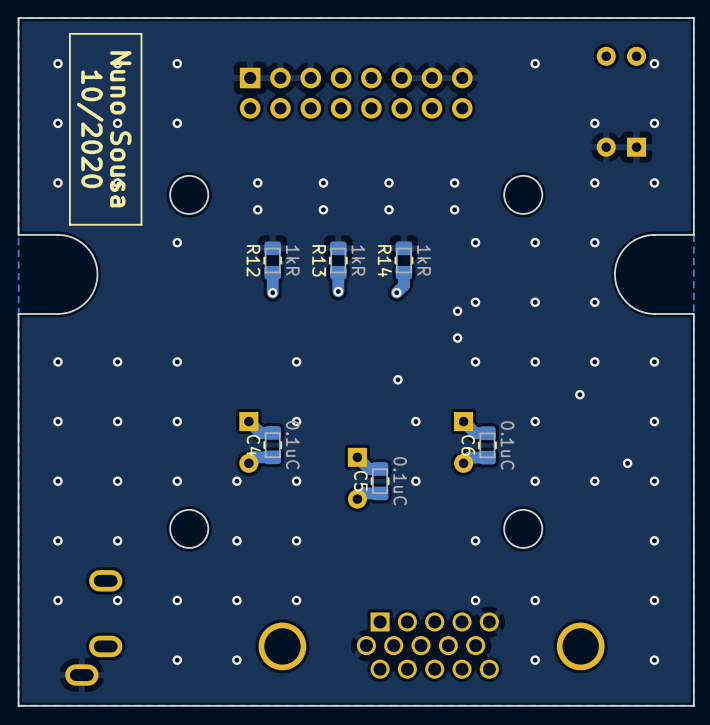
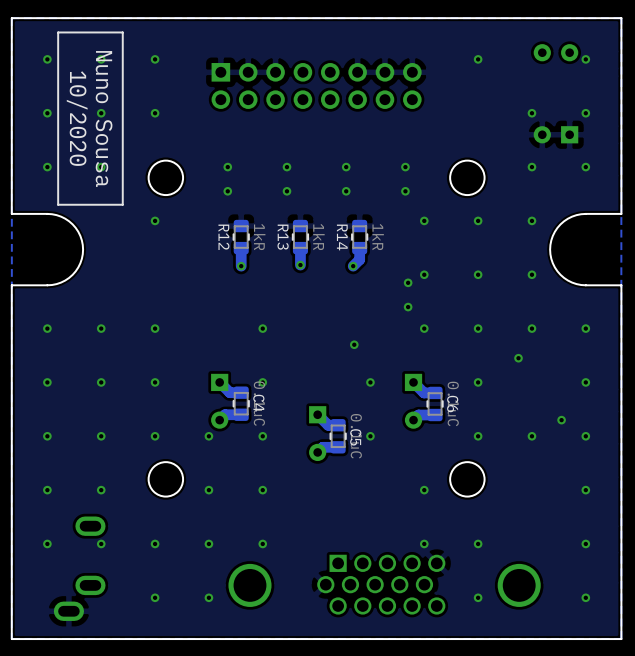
C4 name position: C4 (253, 445) -> C4 (258, 403)
C6 name position: C6 (468, 445) -> C6 (452, 404)
C5 name position: C5 (360, 481) -> C5 (355, 437)

